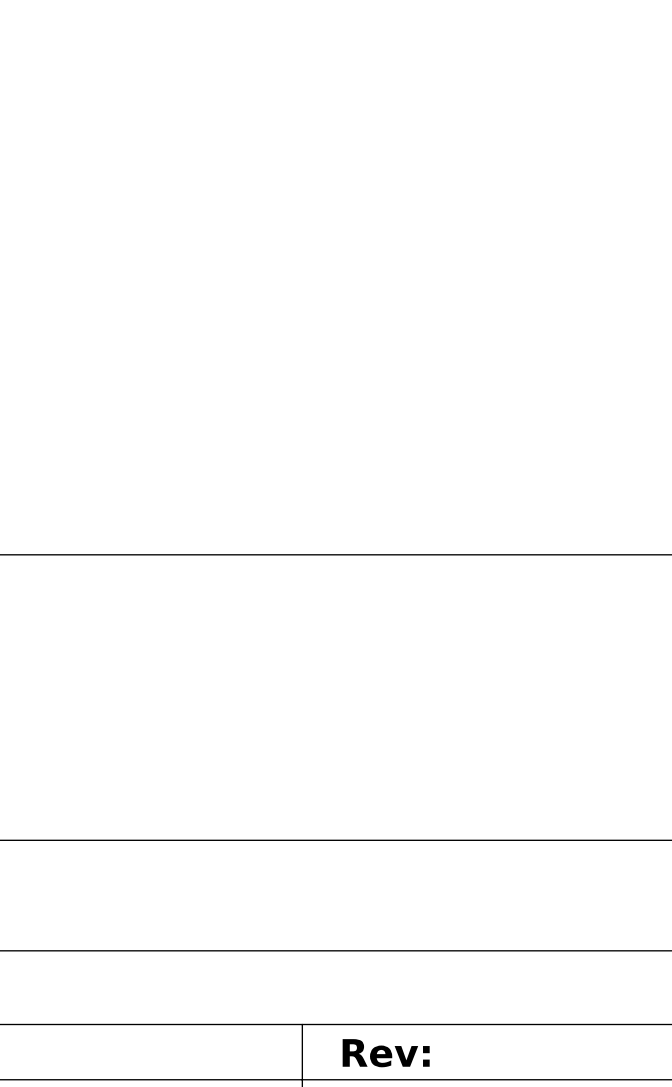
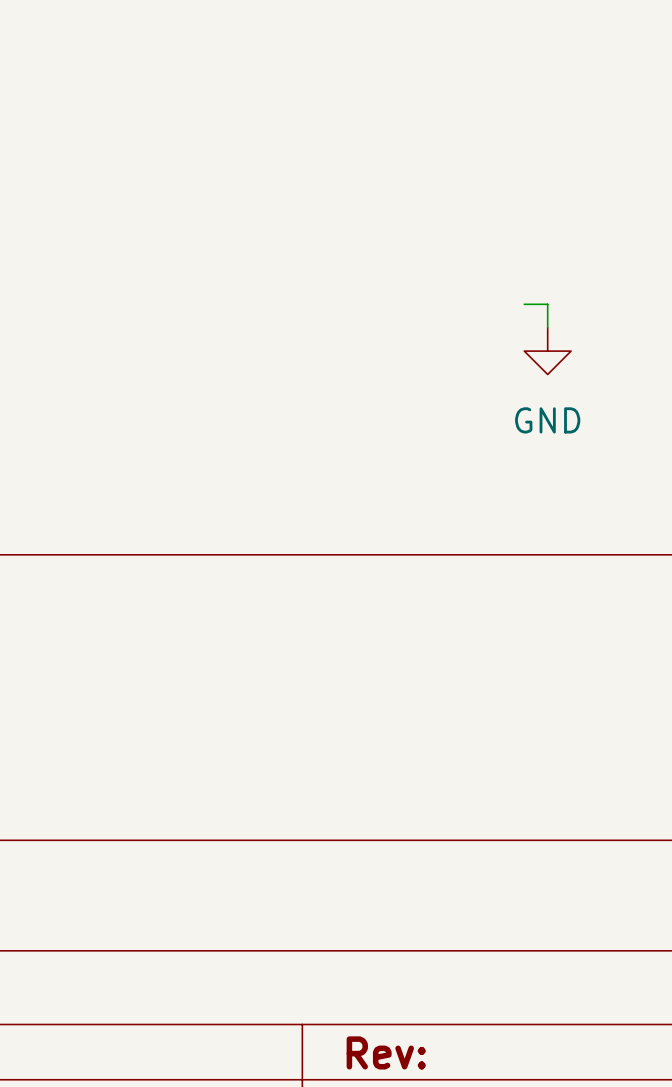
wire: none -> (524, 304) (547, 304) (547, 327)
power symbol: none -> GND (547, 351)

